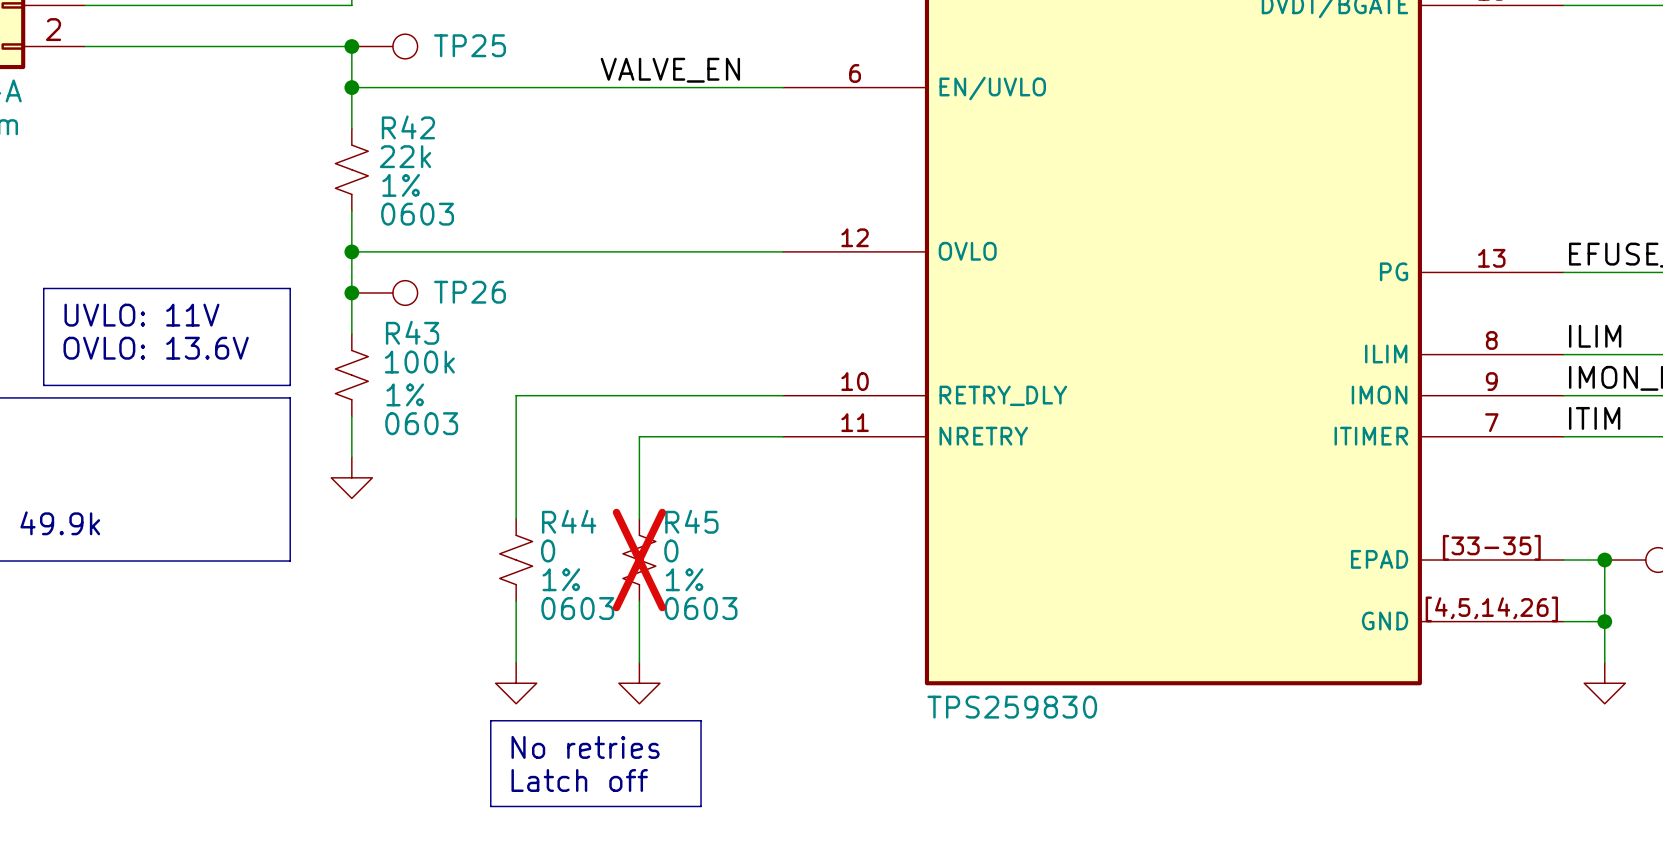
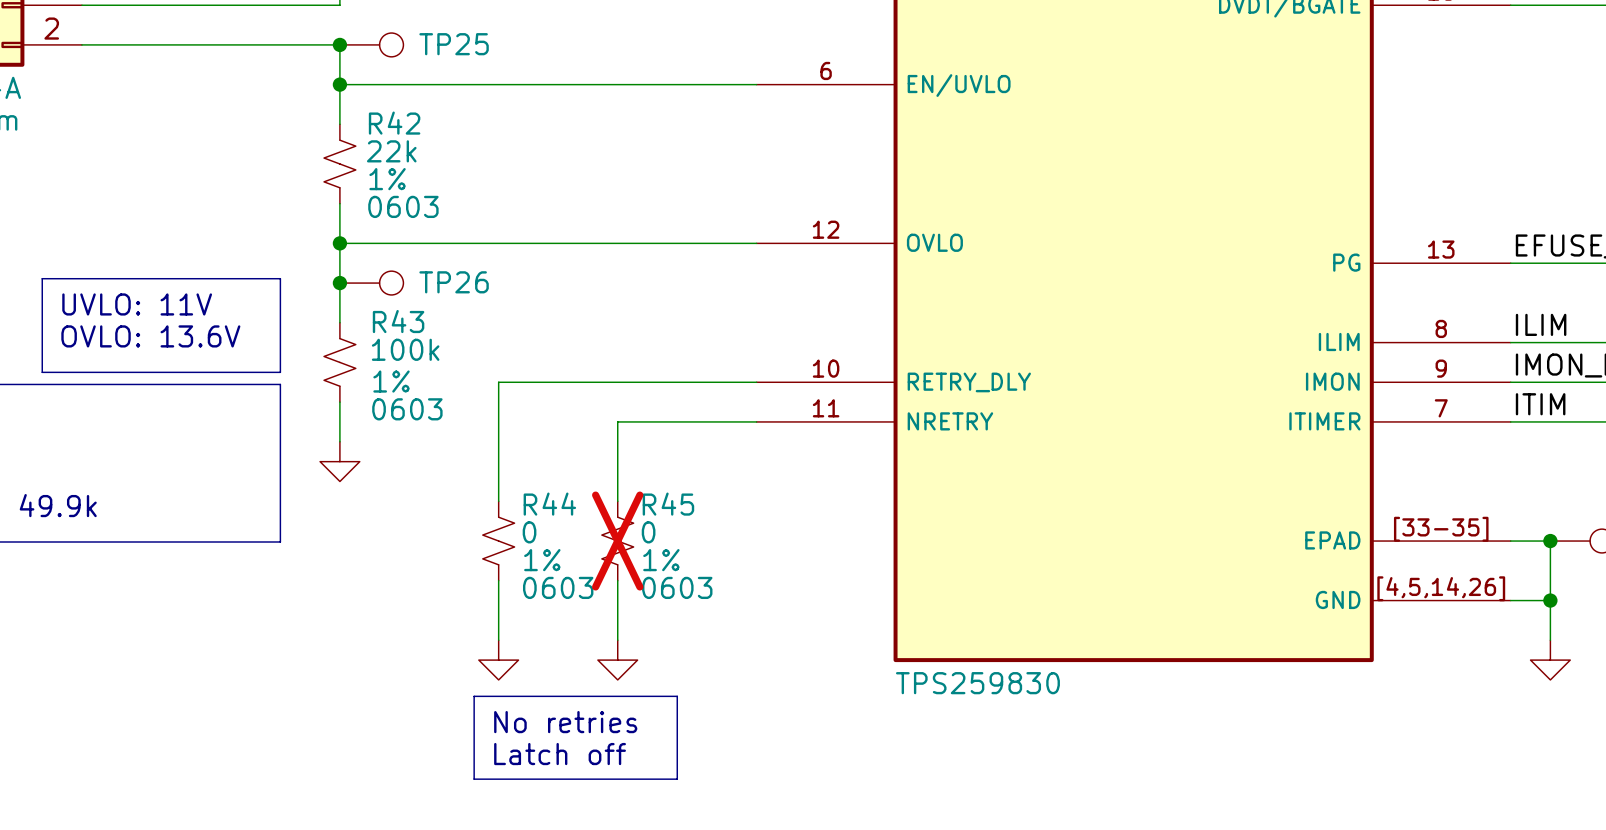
label: VALVE_EN (670, 70) -> none

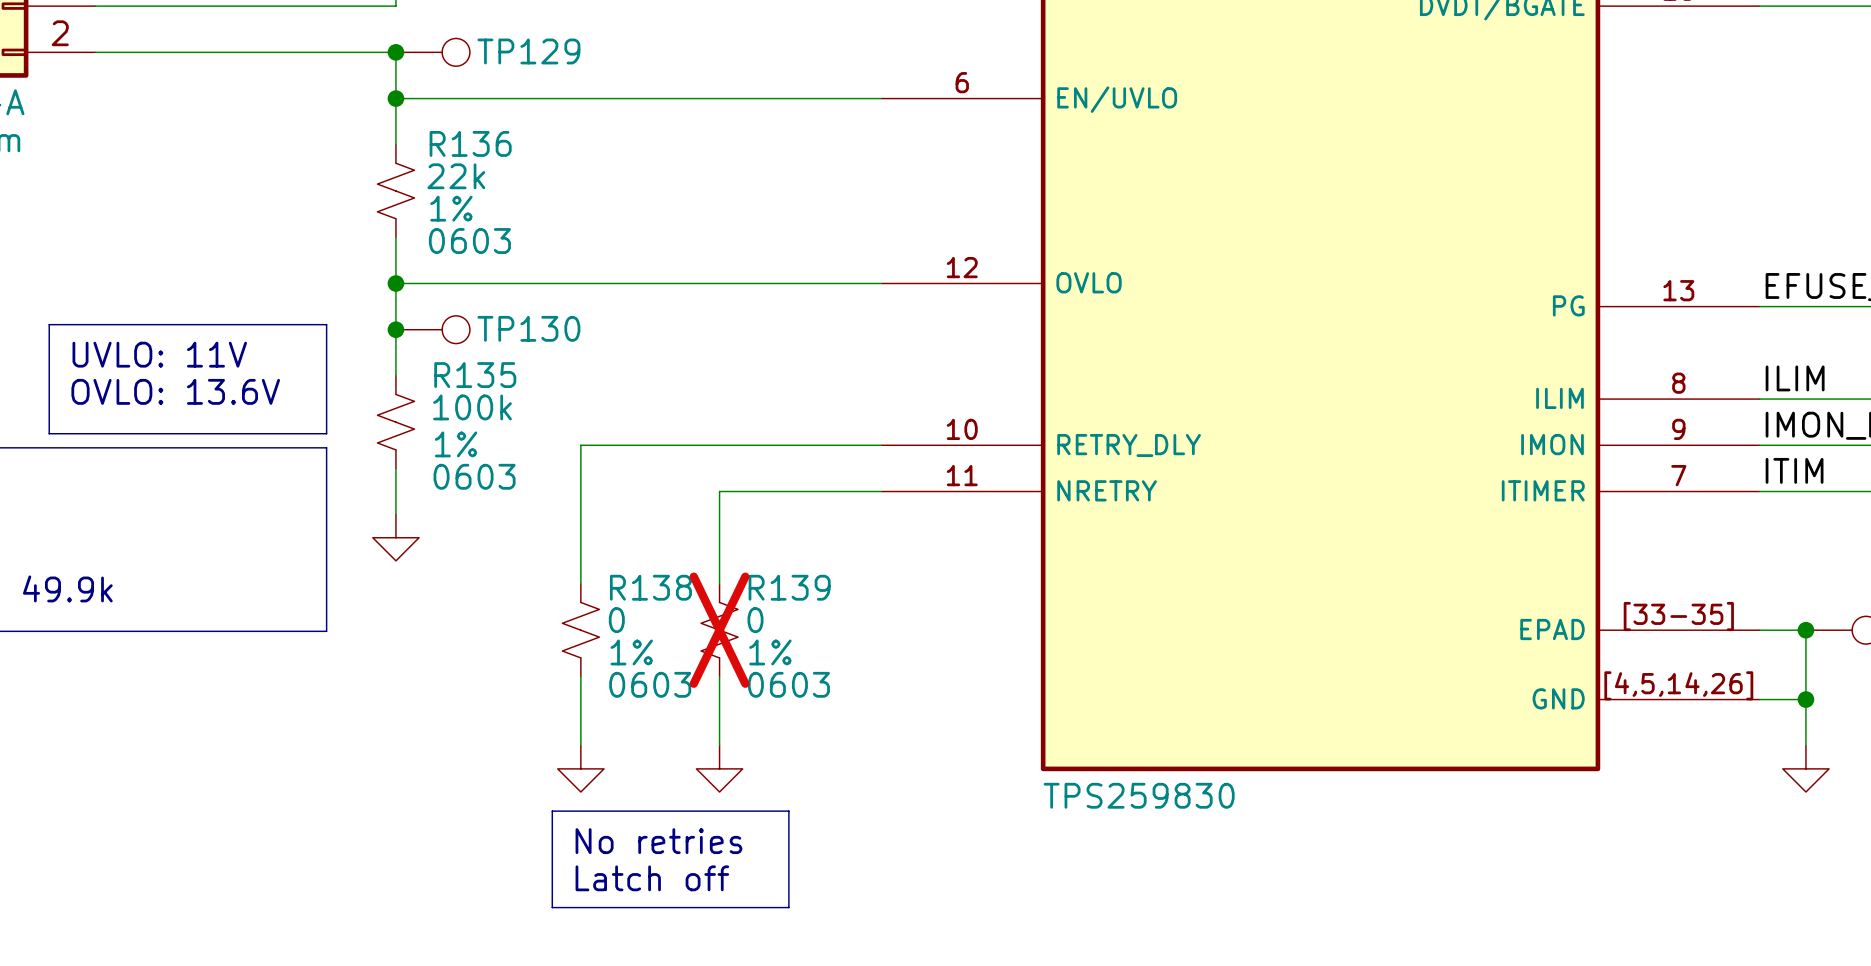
TP25 name: TP25 (454, 44) -> TP129 (528, 51)
R42 name: R42 (394, 123) -> R136 (470, 143)
TP26 name: TP26 (454, 282) -> TP130 (528, 328)
R43 name: R43 (398, 321) -> R135 (475, 375)
R44 name: R44 (549, 504) -> R138 (650, 587)
R45 name: R45 (668, 504) -> R139 (789, 587)

